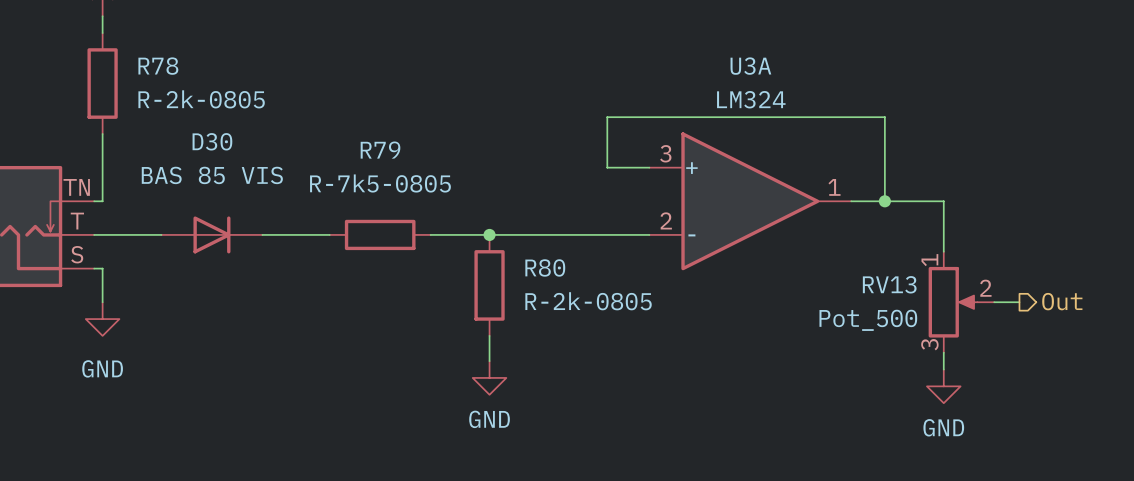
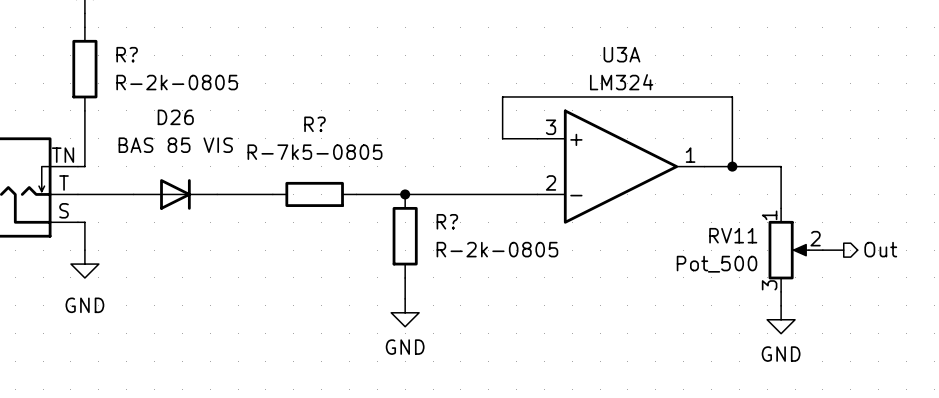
R78 name: R78 (158, 66) -> R? (127, 54)
D30 name: D30 (212, 141) -> D26 (175, 117)
R79 name: R79 (380, 150) -> R? (314, 124)
R80 name: R80 (545, 267) -> R? (447, 221)
RV13 name: RV13 (889, 284) -> RV11 (733, 235)

